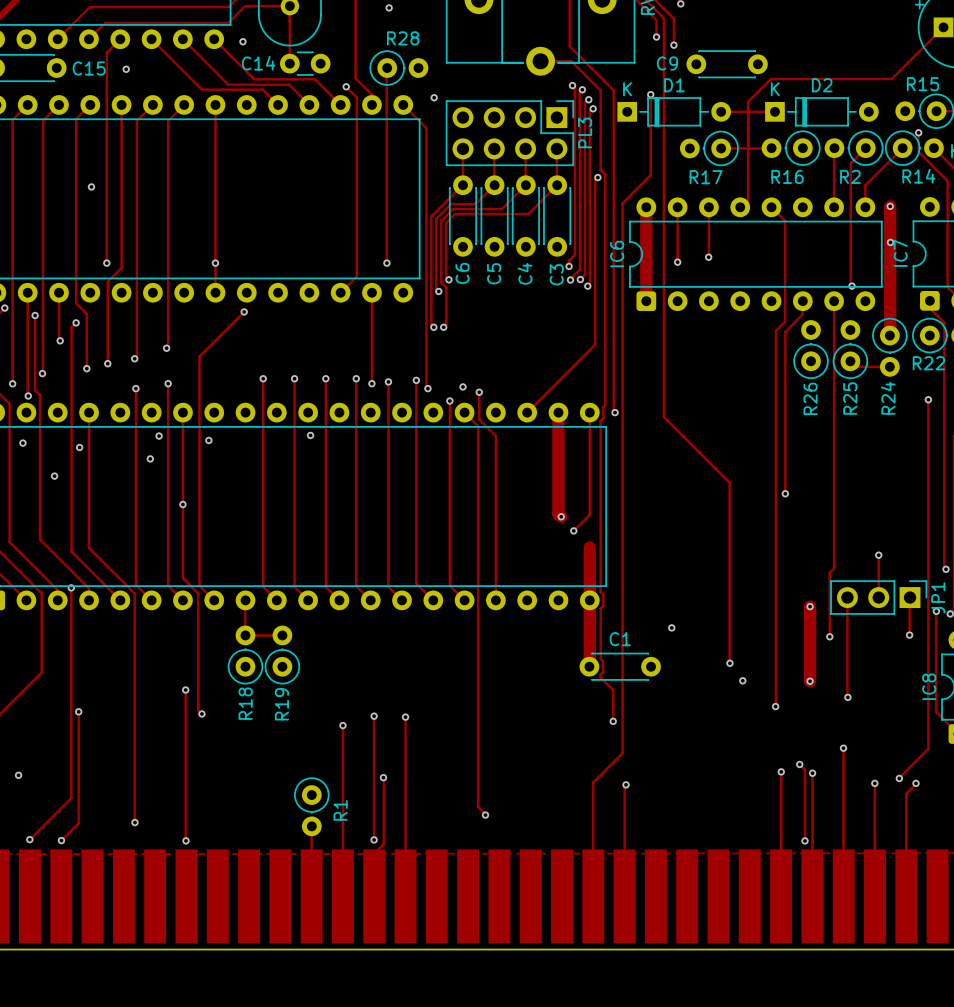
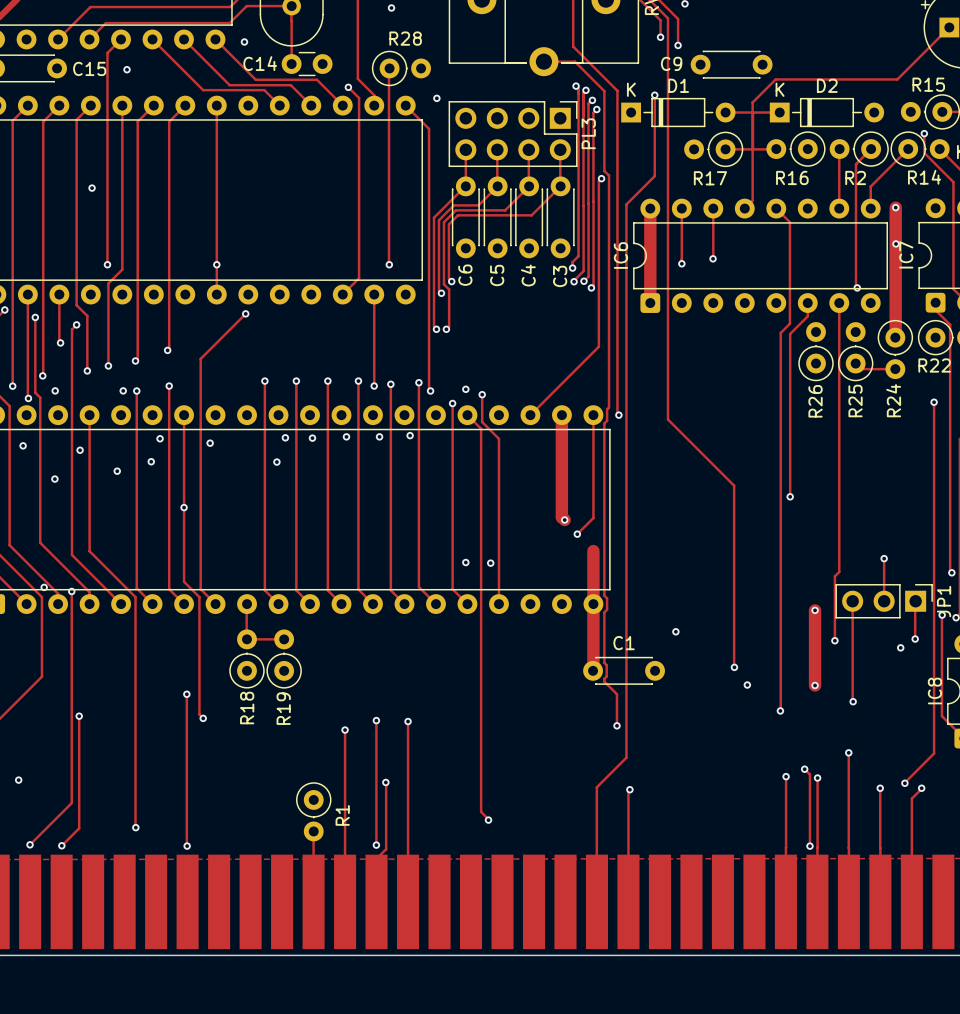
via: none -> (55, 390)
via: none -> (123, 390)
via: none -> (410, 435)
via: none -> (346, 436)
via: none -> (379, 436)
via: none -> (285, 437)
via: none -> (276, 462)
via: none -> (117, 471)
via: none -> (465, 562)
via: none -> (490, 563)
via: none -> (44, 587)
via: none -> (900, 647)

